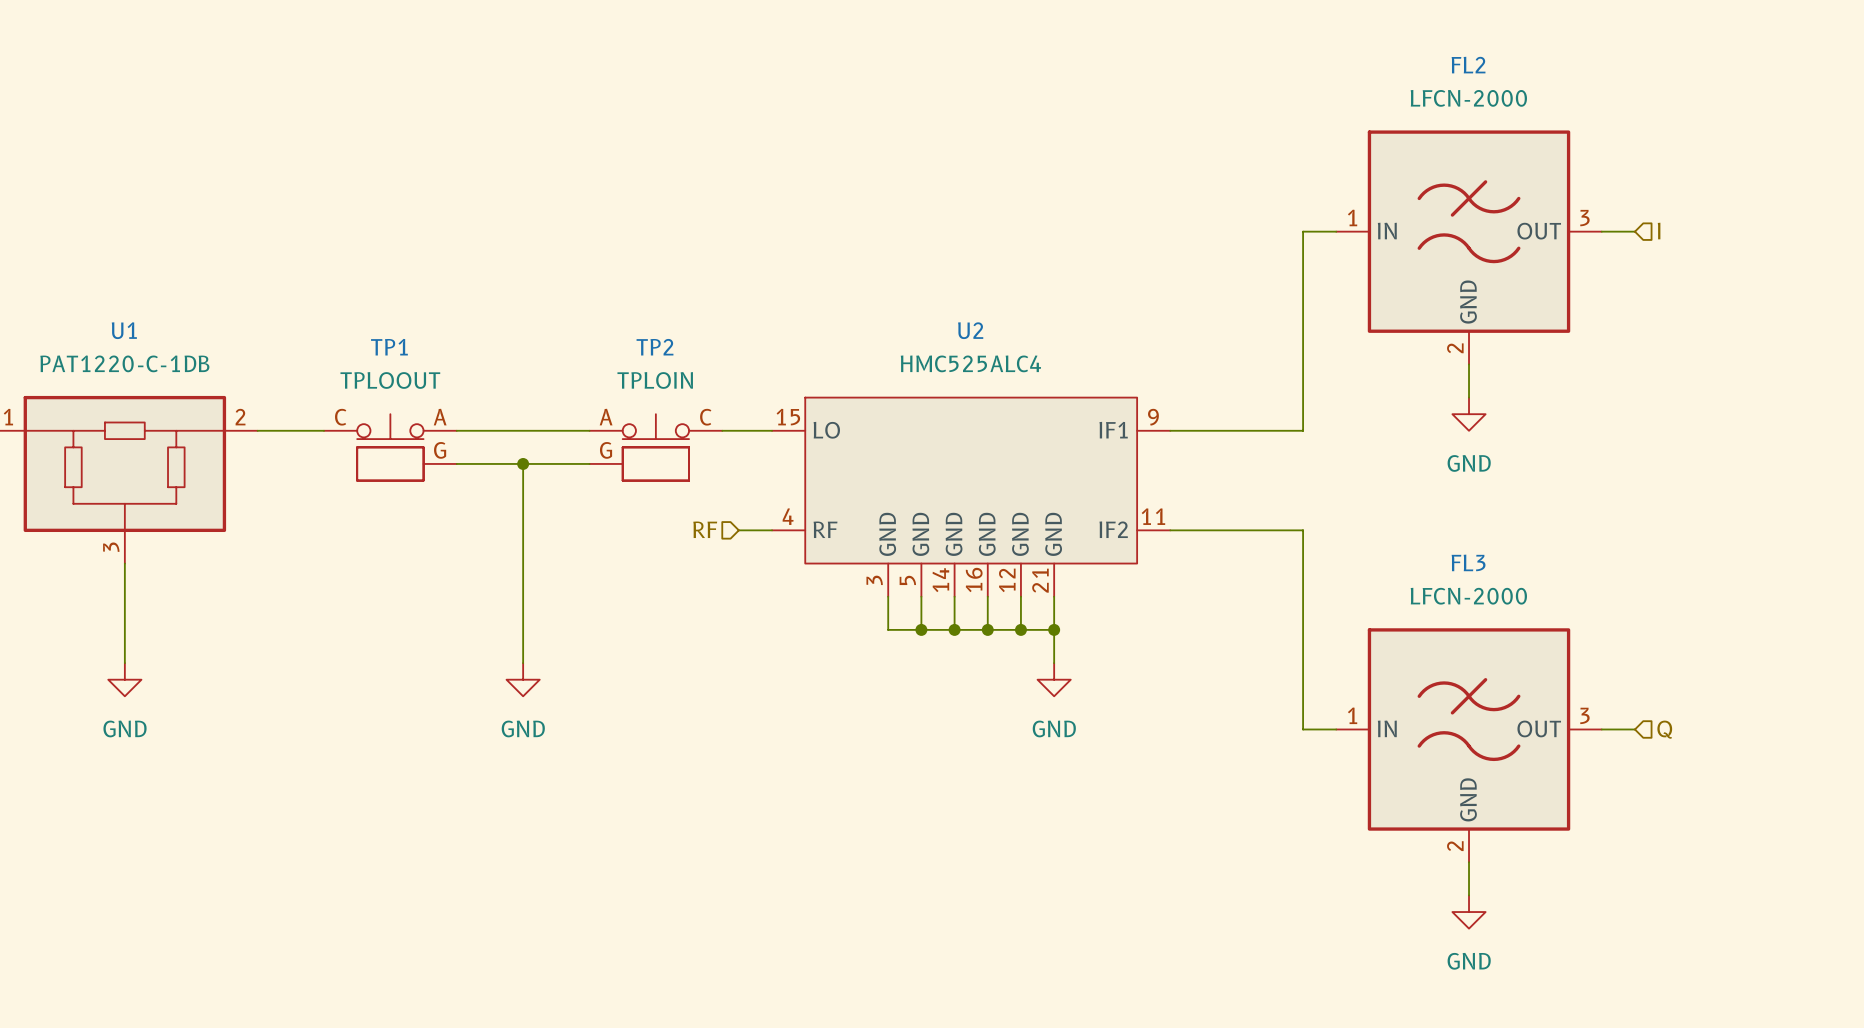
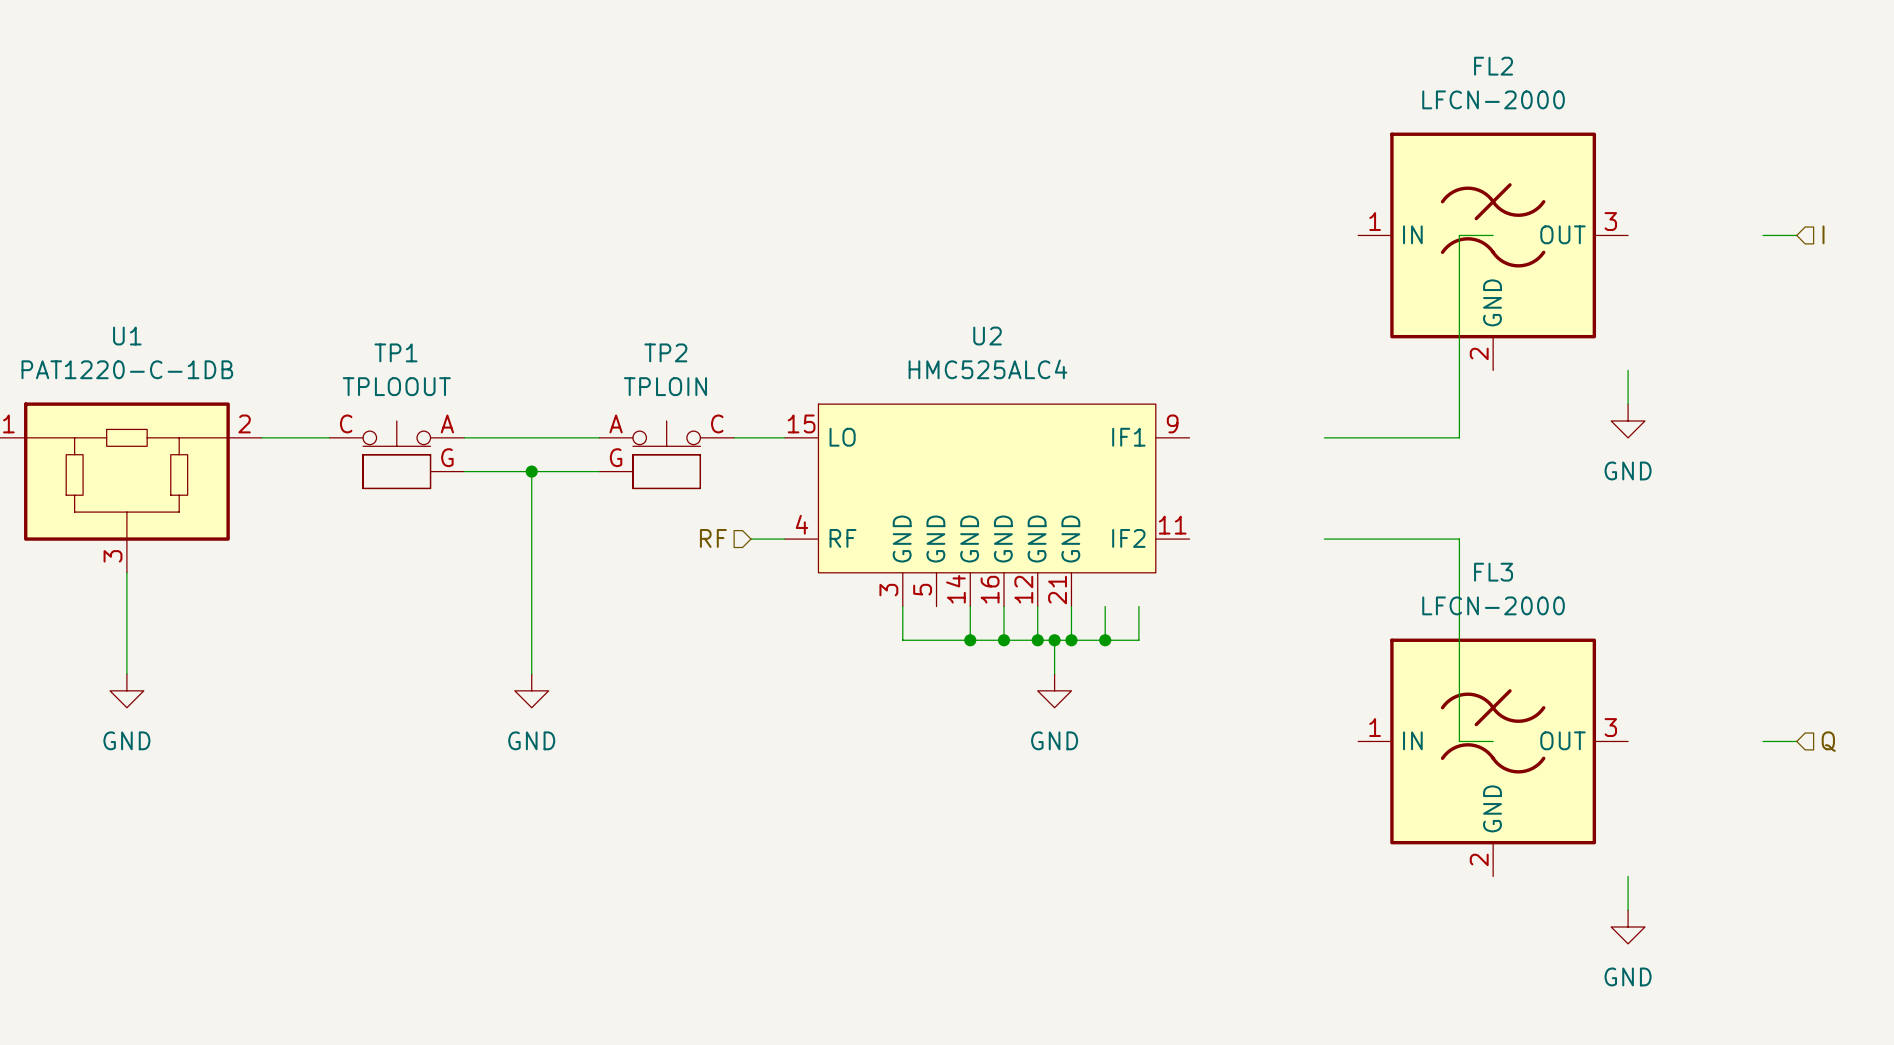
wire: (1336, 231) (1303, 231) (1303, 430) (1170, 430) -> (1493, 235) (1459, 235) (1459, 437) (1324, 437)
wire: (1601, 231) (1634, 231) -> (1763, 235) (1796, 235)
hierarchical label position: I (1659, 231) -> I (1823, 234)
wire: (1469, 364) (1469, 397) -> (1628, 370) (1628, 404)
power symbol position: GND (1469, 414) -> GND (1628, 420)
wire: (1170, 530) (1303, 530) (1303, 729) (1336, 729) -> (1324, 539) (1459, 539) (1459, 741) (1493, 741)
wire: (921, 596) (921, 629) -> (1054, 640) (1054, 673)
wire: none -> (1105, 606) (1105, 640)
junction: (921, 629) -> none
junction: none -> (1054, 640)
wire: (1054, 629) (1054, 663) -> (1071, 640) (1138, 640) (1138, 606)
junction: none -> (1105, 640)
power symbol position: GND (1054, 679) -> GND (1054, 690)
wire: (1601, 729) (1634, 729) -> (1763, 741) (1796, 741)
hierarchical label position: Q (1664, 729) -> Q (1828, 741)
wire: (1469, 862) (1469, 895) -> (1628, 876) (1628, 910)
power symbol position: GND (1469, 912) -> GND (1628, 927)

